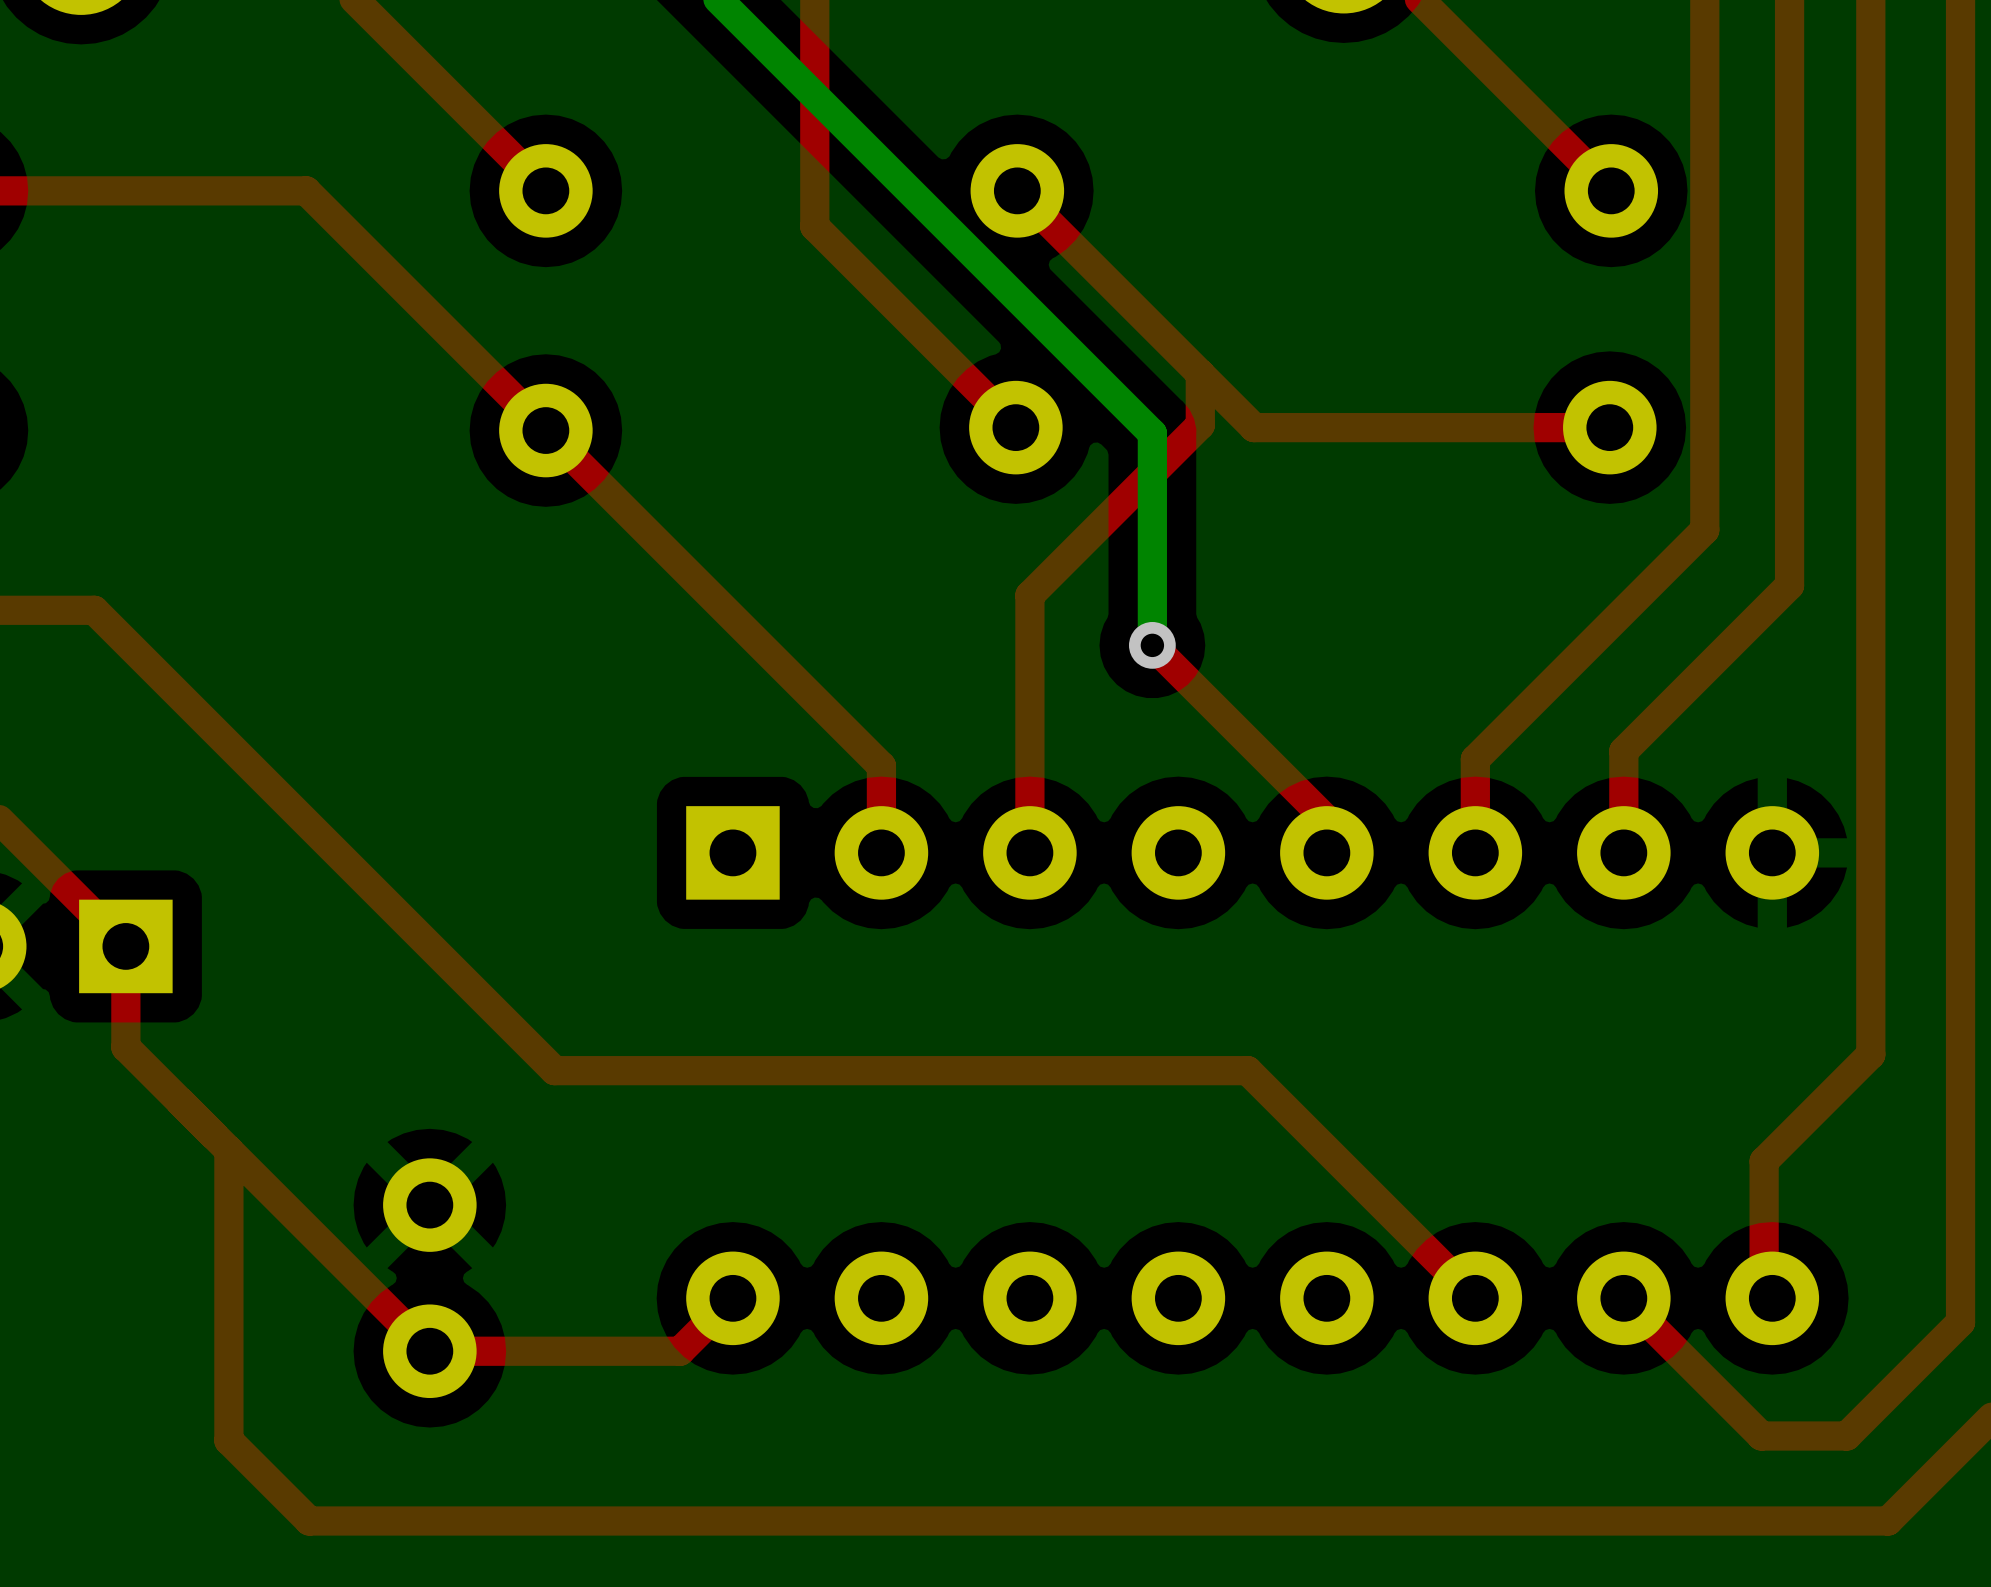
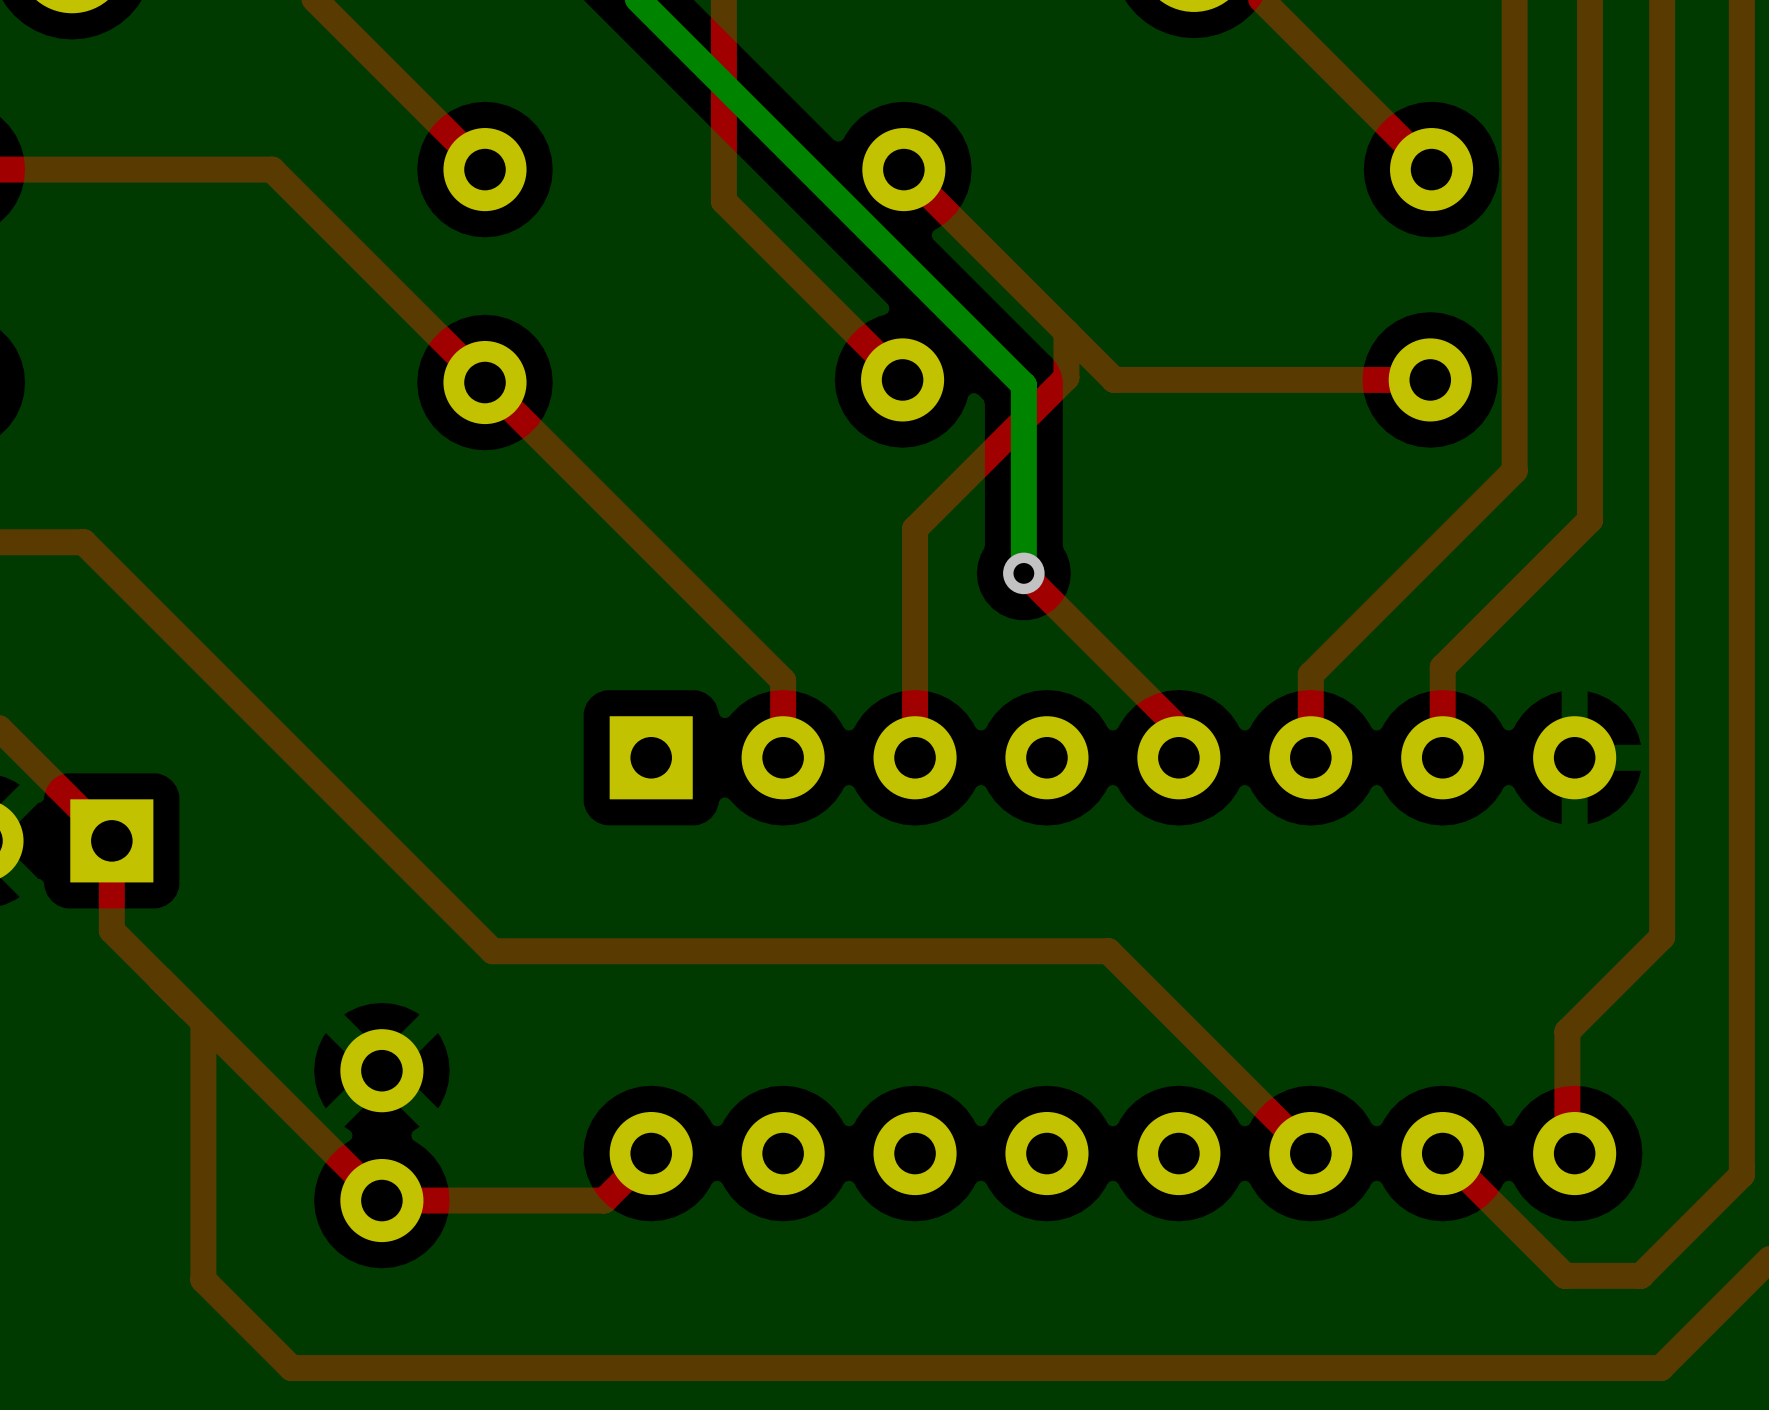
top track: (1888, 1521) (309, 1521) -> (1677, 1351) (1660, 1368) (291, 1368) (274, 1351)

